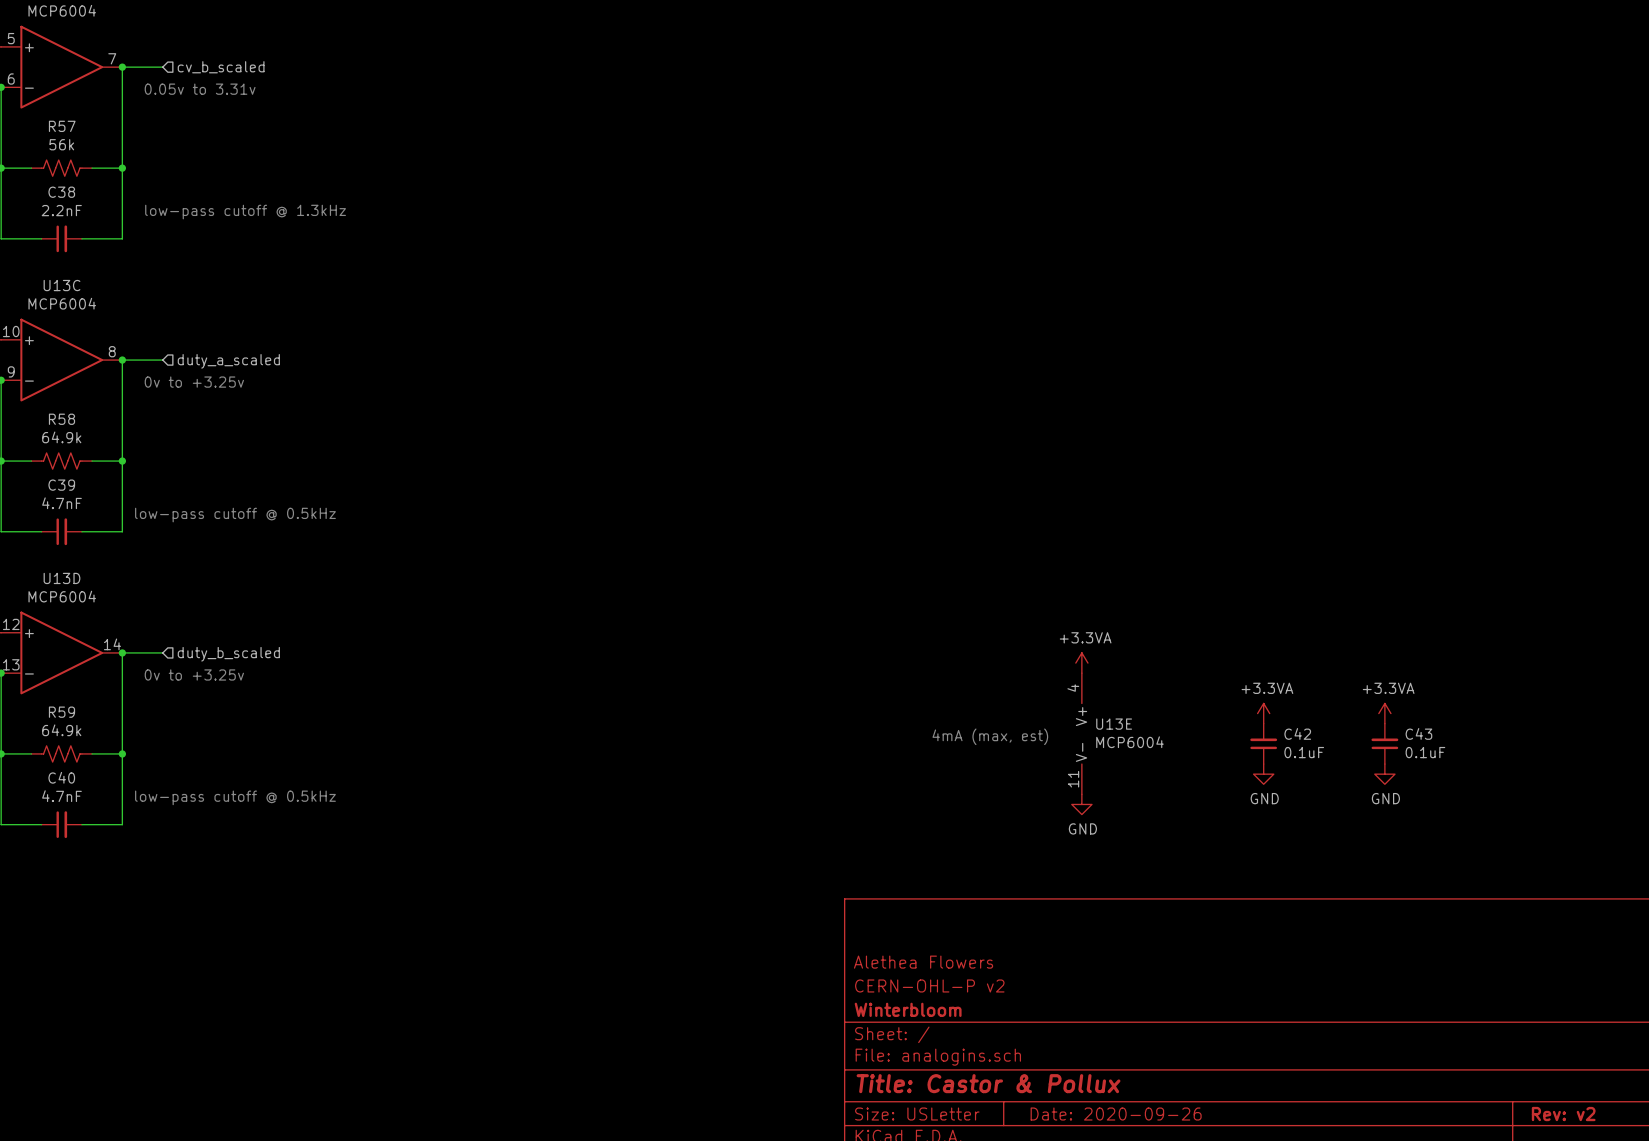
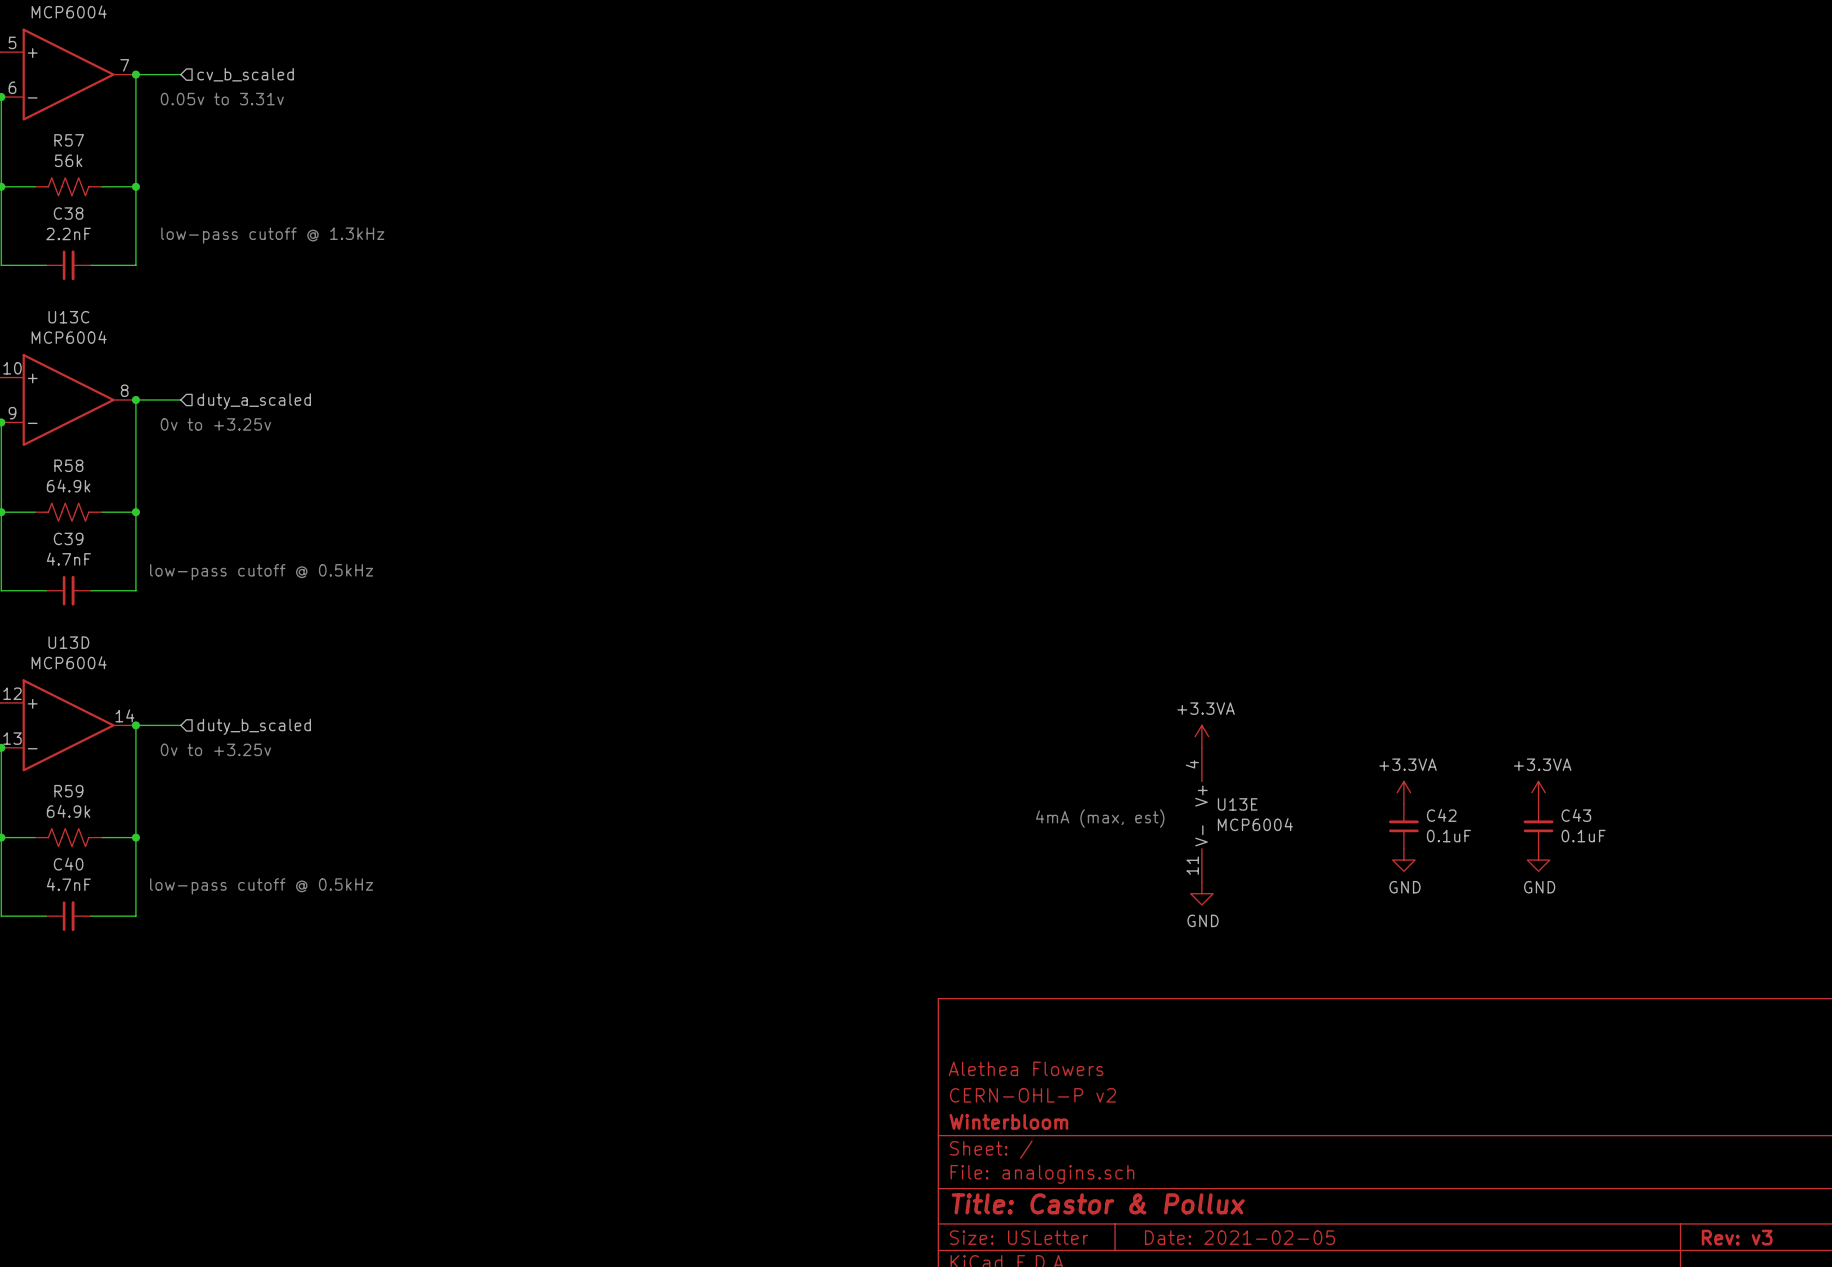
title block: Date: 2020-09-26 (1116, 1114) -> Date: 2021-02-05 (1239, 1237)
title block: Rev: v2 (1563, 1114) -> Rev: v3 (1737, 1237)

